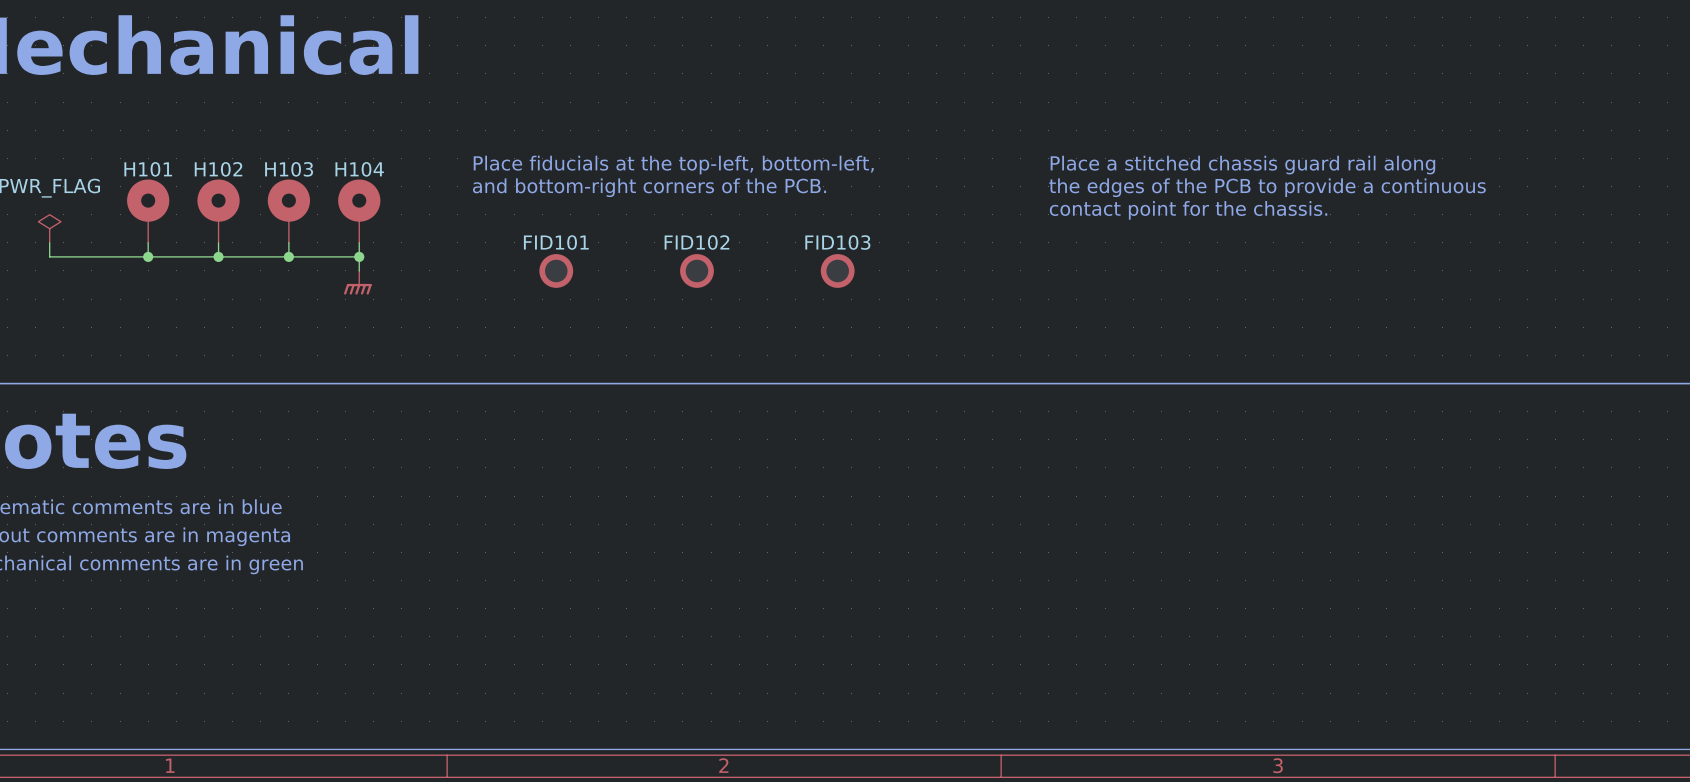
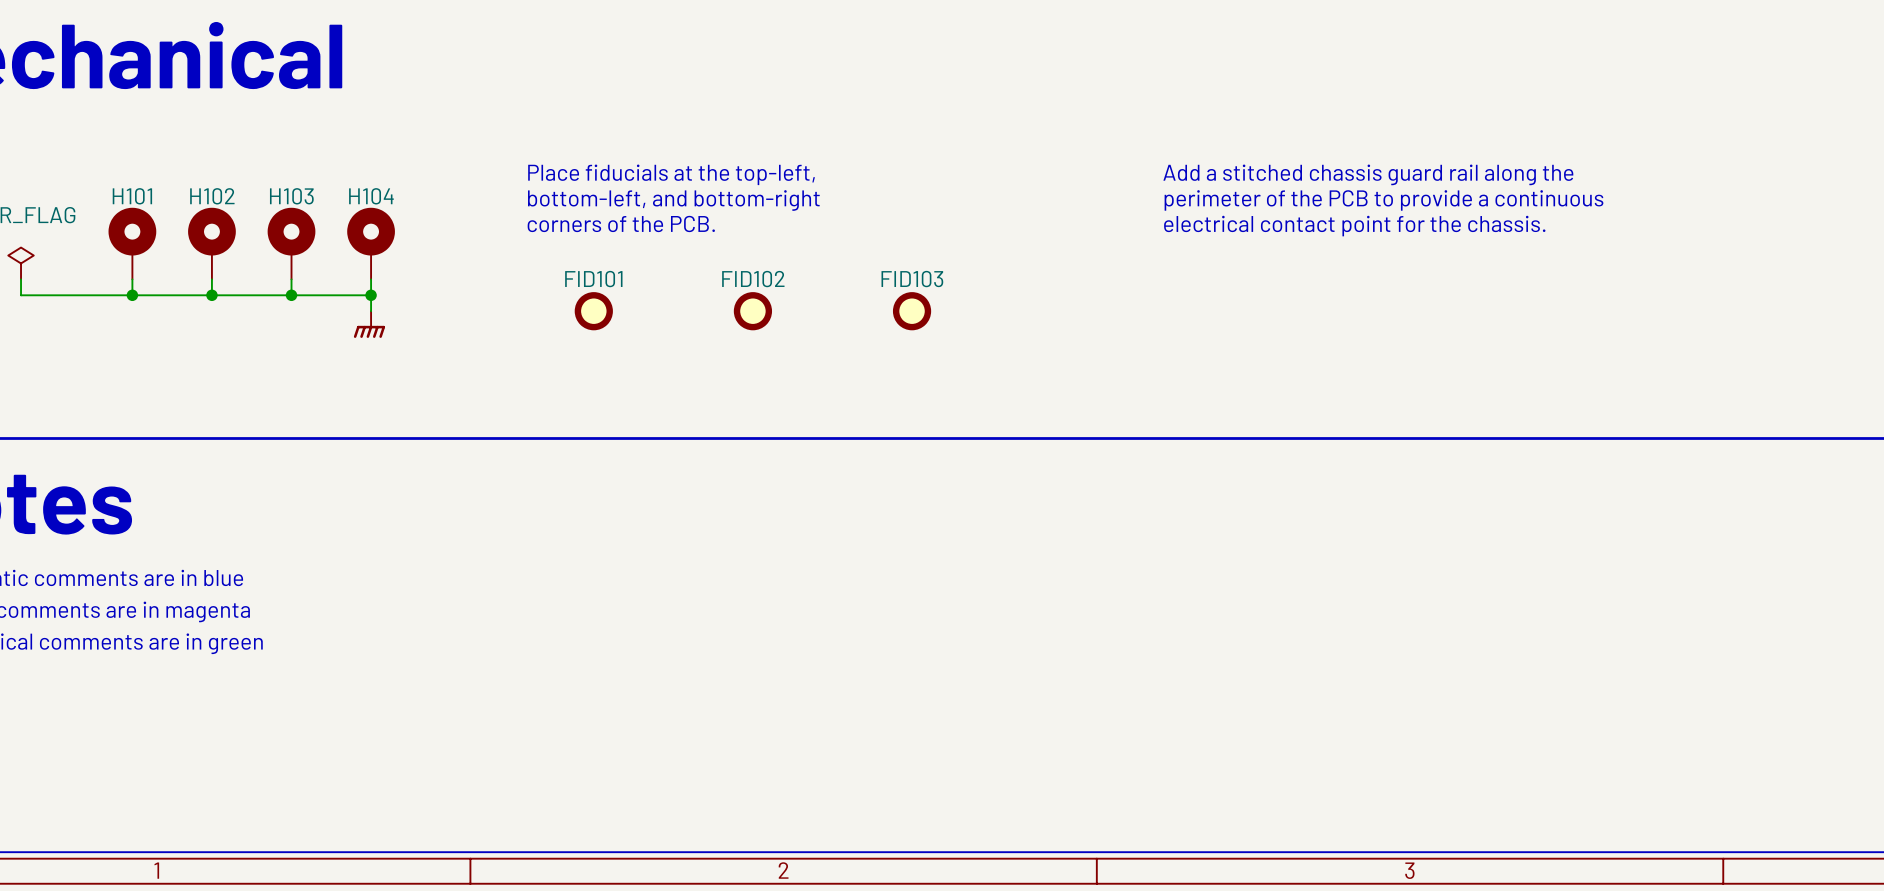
text: Place fiducials at the top-left, bottom-left, (673, 165) -> Place fiducials at the top-left, (671, 174)
text: Place a stitched chassis guard rail along (1242, 165) -> Add a stitched chassis guard rail along the (1368, 174)
text: none -> bottom-left, and bottom-right (673, 200)
text: and bottom-right corners of the PCB. (649, 187) -> corners of the PCB. (621, 223)
text: the edges of the PCB to provide a continuous (1267, 187) -> perimeter of the PCB to provide a continuous (1383, 200)
text: contact point for the chassis. (1188, 210) -> electrical contact point for the chassis. (1354, 226)

